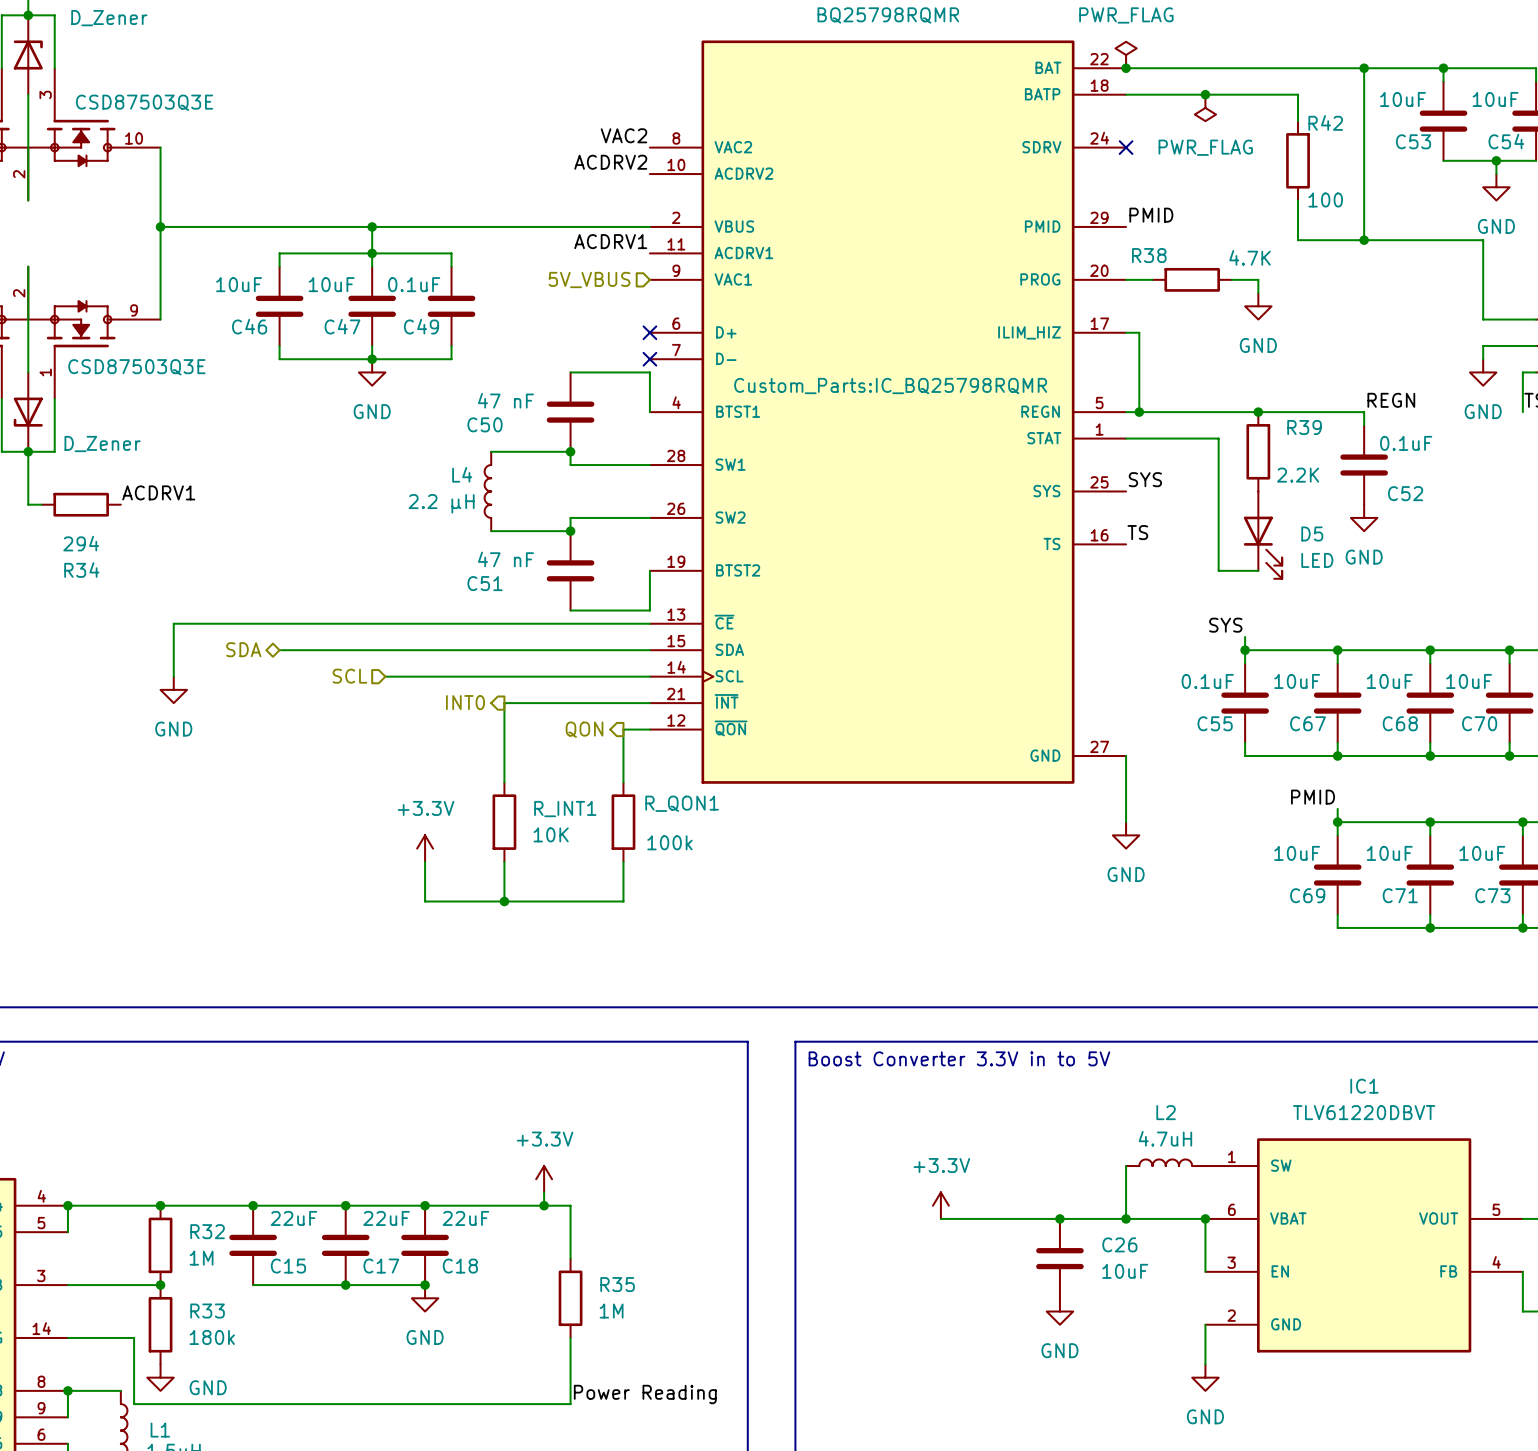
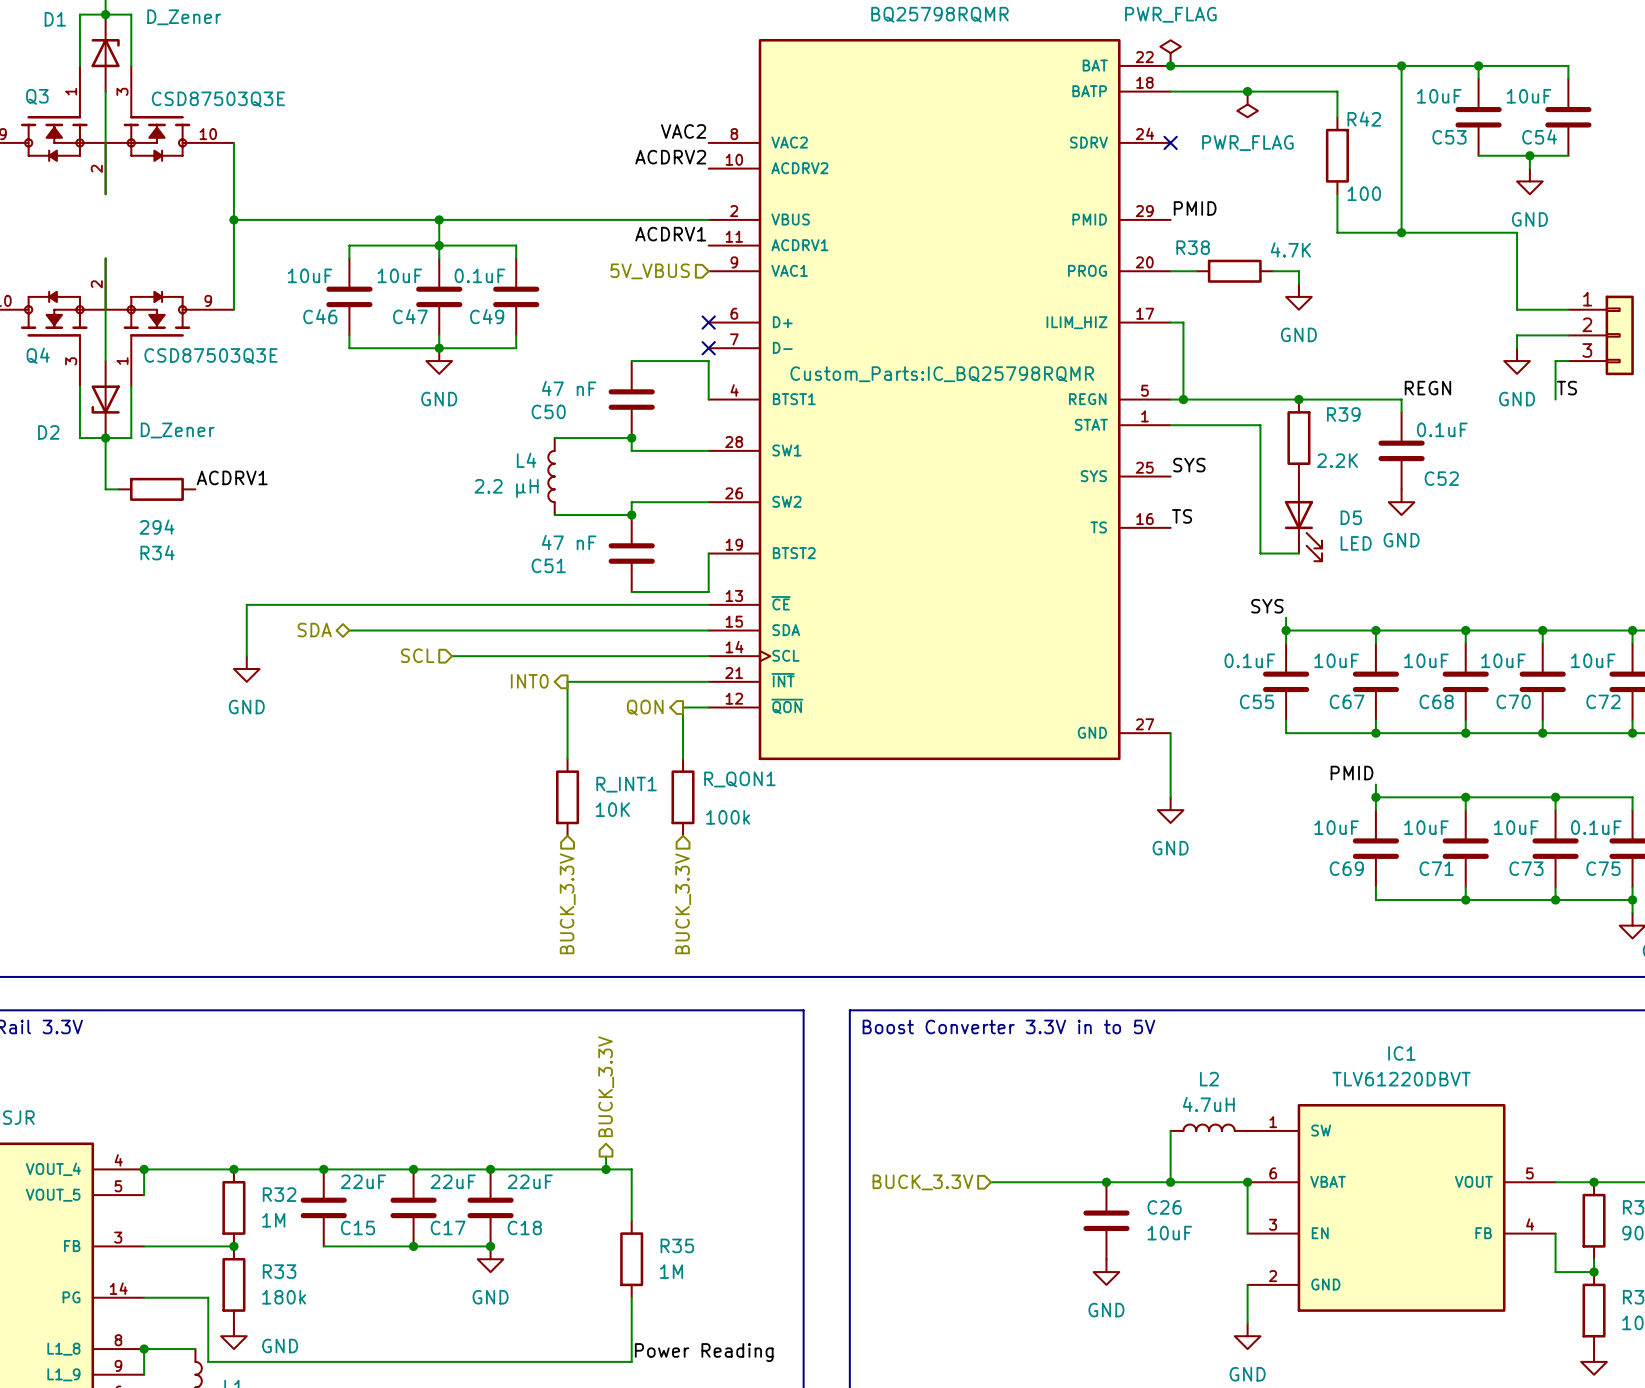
power symbol: +3.3V (425, 848) -> none
wire: (425, 861) (425, 901) (623, 901) (623, 861) -> none
wire: (504, 861) (504, 901) -> none
junction: (504, 901) -> none
hierarchical label: none -> BUCK_3.3V (567, 903)
hierarchical label: none -> BUCK_3.3V (683, 903)
hierarchical label: none -> BUCK_3.3V (606, 1086)
power symbol: +3.3V (544, 1179) -> none
power symbol: +3.3V (940, 1205) -> none
hierarchical label: none -> BUCK_3.3V (922, 1182)

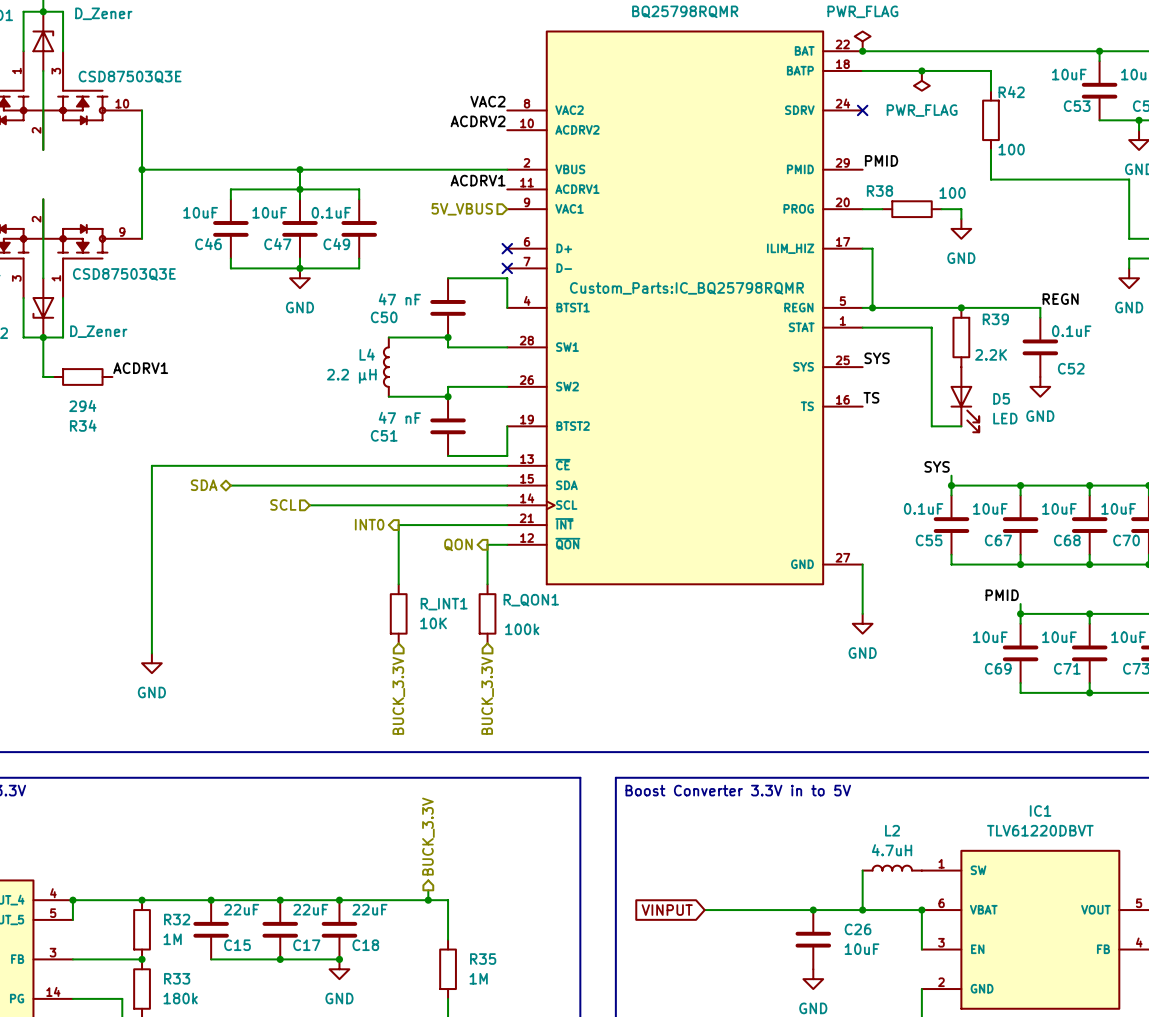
wire: (1401, 65) (1401, 232) -> none
junction: (1401, 65) -> none
junction: (1401, 232) -> none
R38 value: 4.7K (1290, 249) -> 100 (952, 193)
wire: none -> (151, 505) (151, 653)
power symbol position: GND (246, 669) -> GND (151, 663)
global label: none -> VINPUT (667, 910)
hierarchical label: BUCK_3.3V (922, 1182) -> none
wire: none -> (704, 910) (724, 910)

